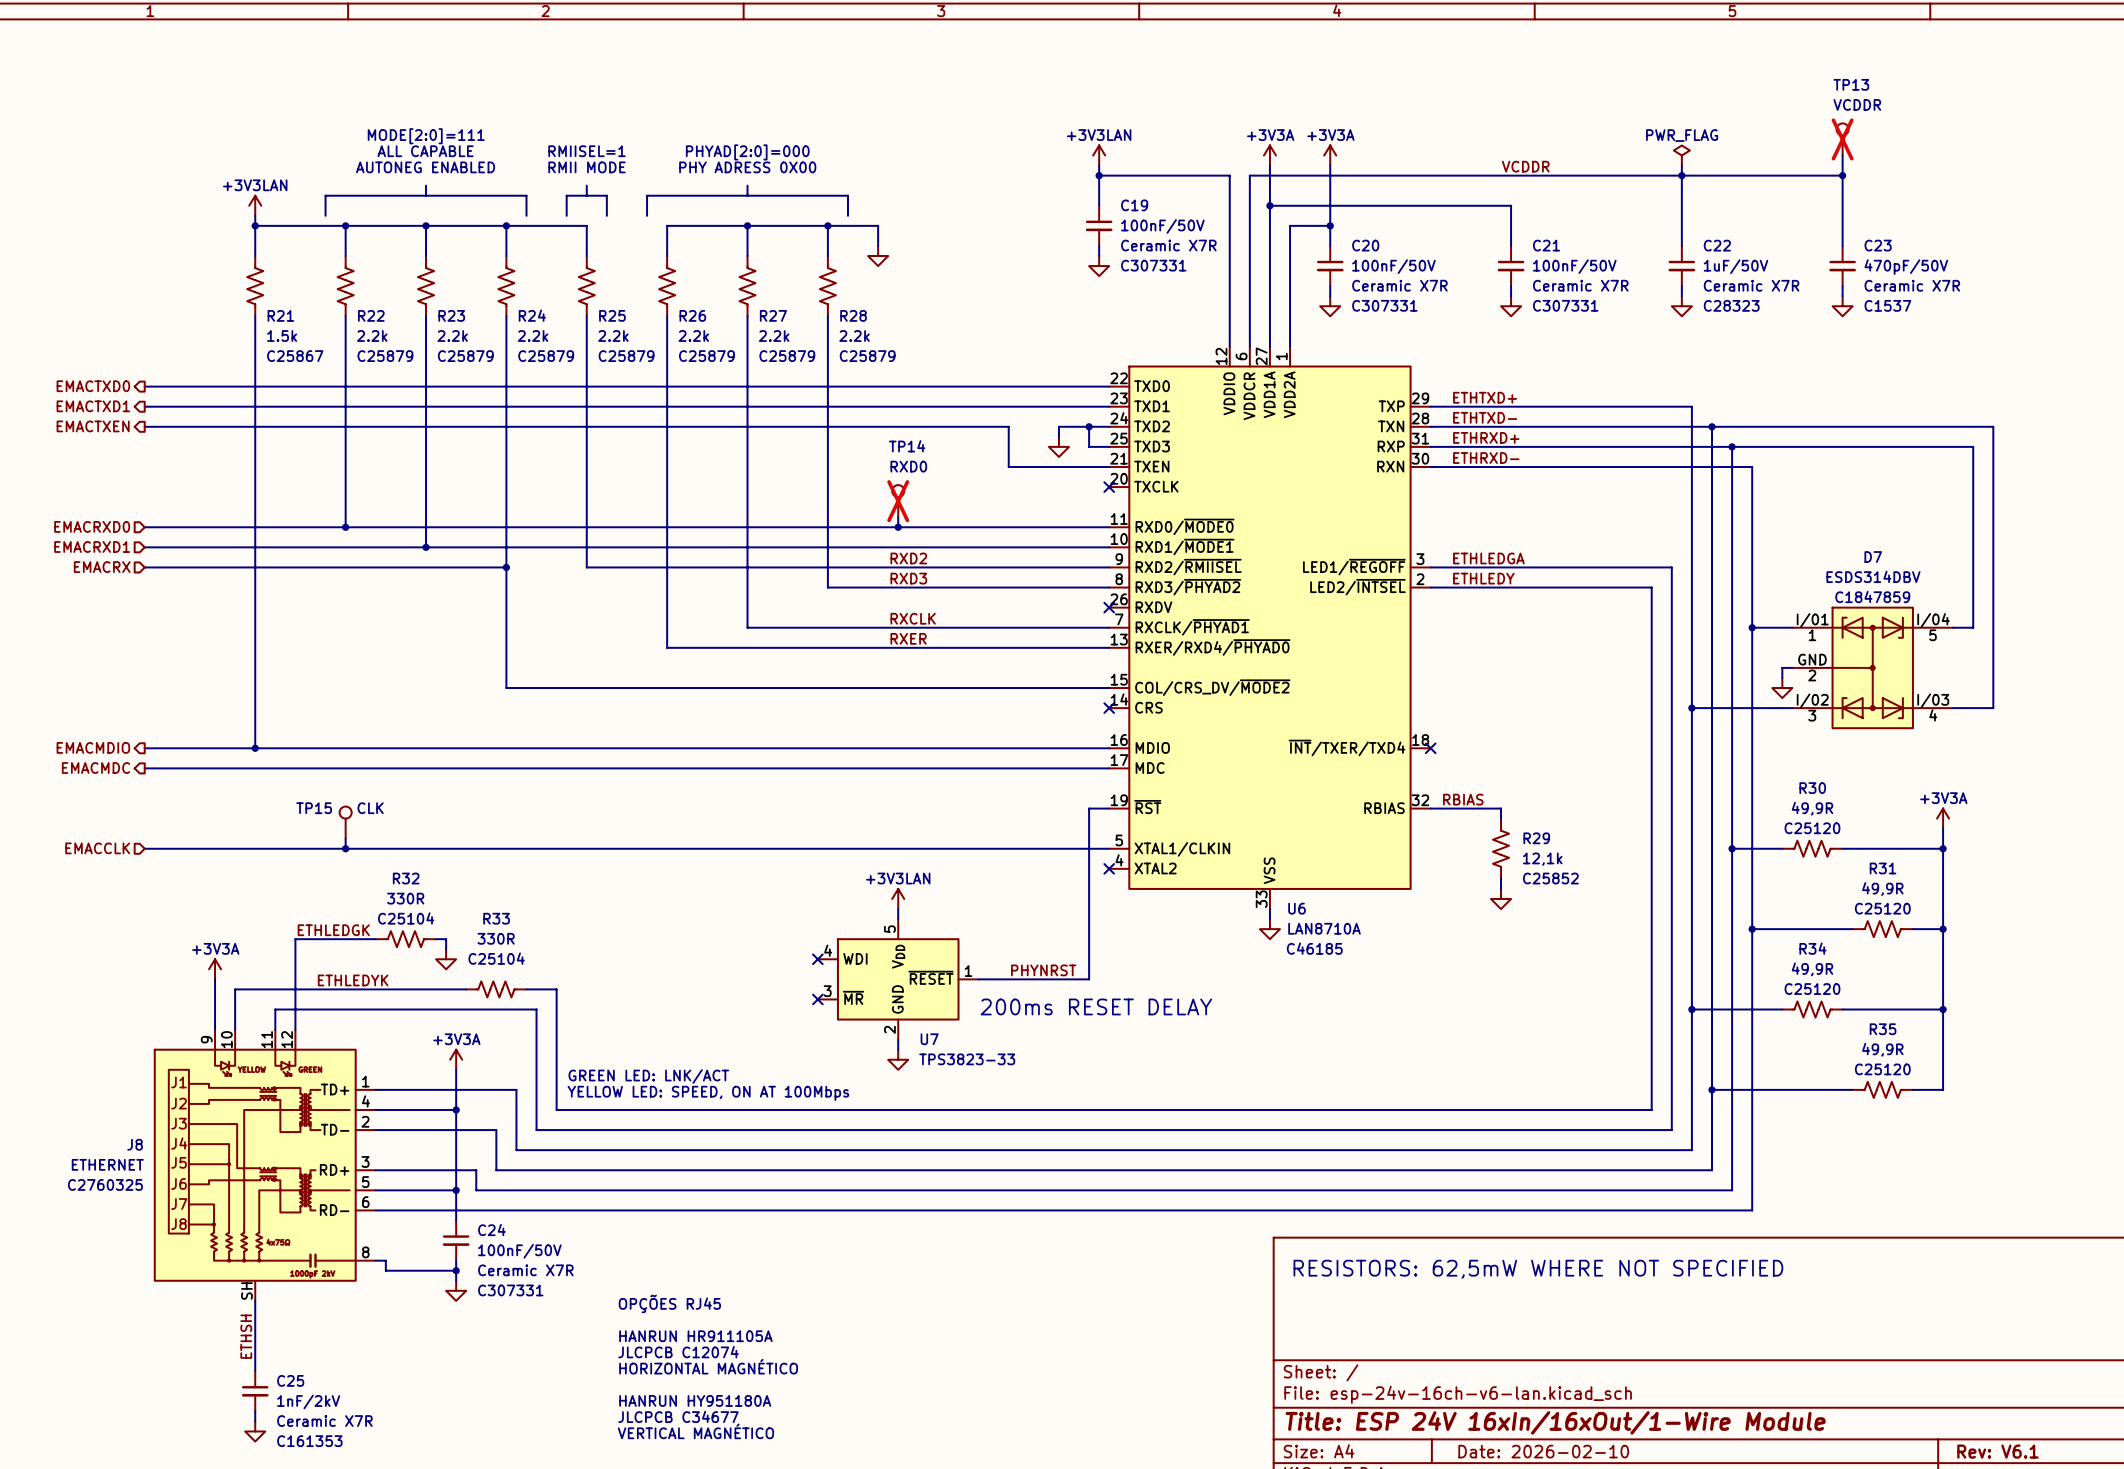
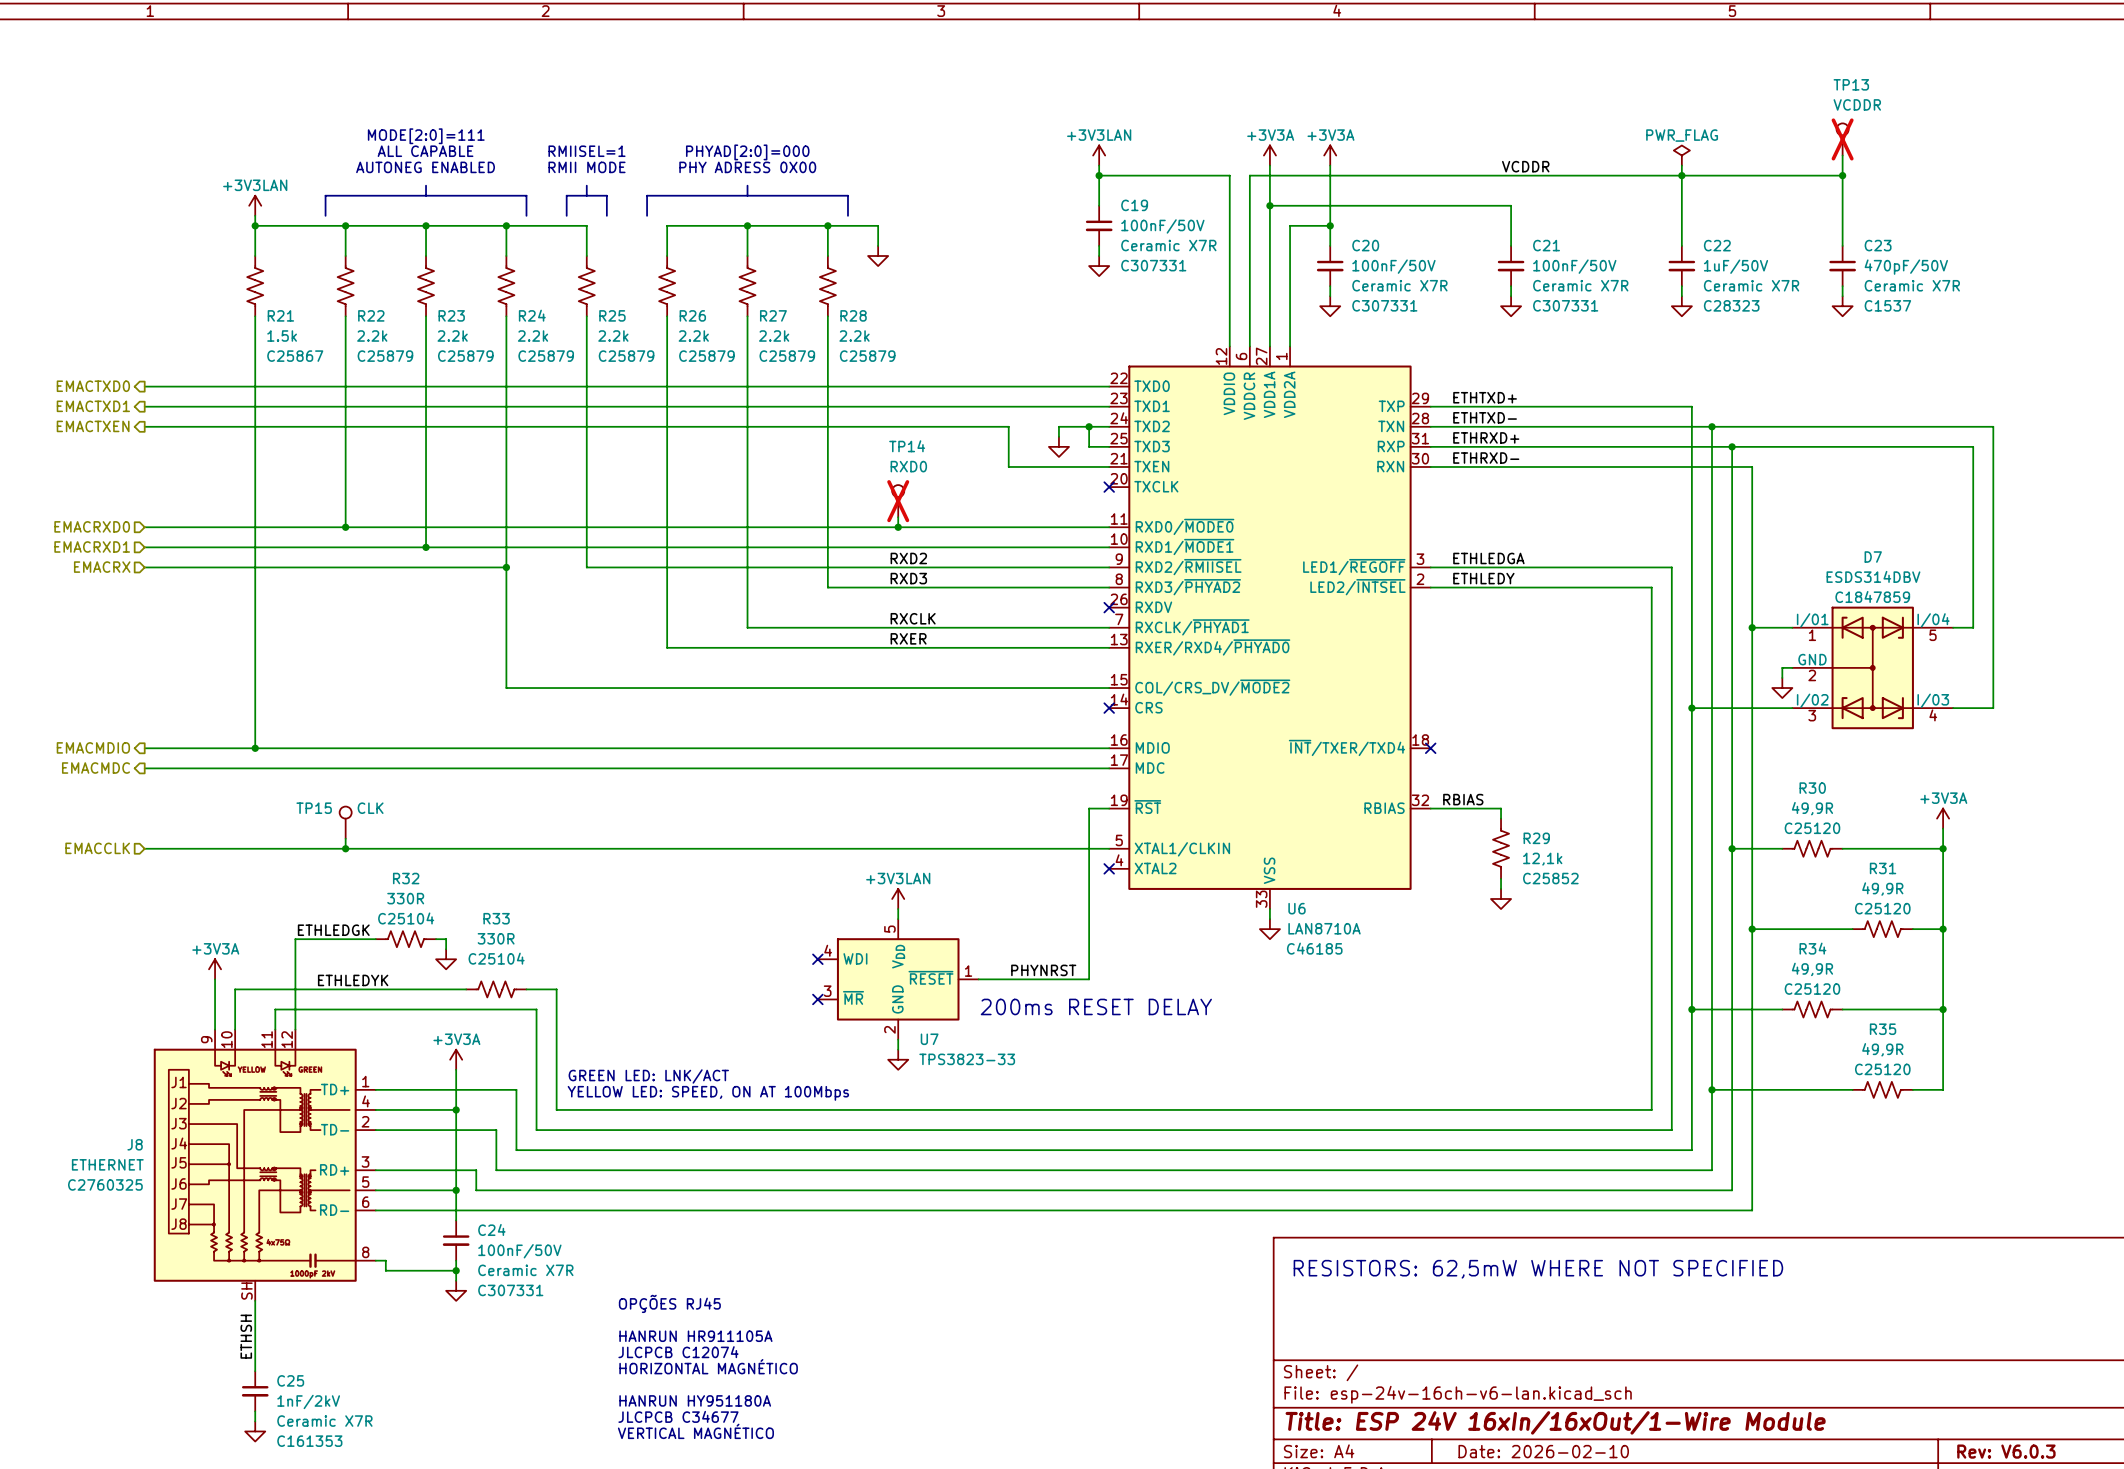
title block: Rev: V6.1 (1997, 1451) -> Rev: V6.0.3 (2006, 1451)

